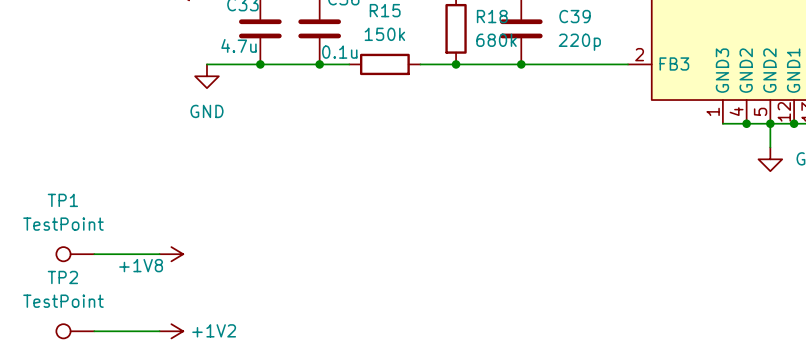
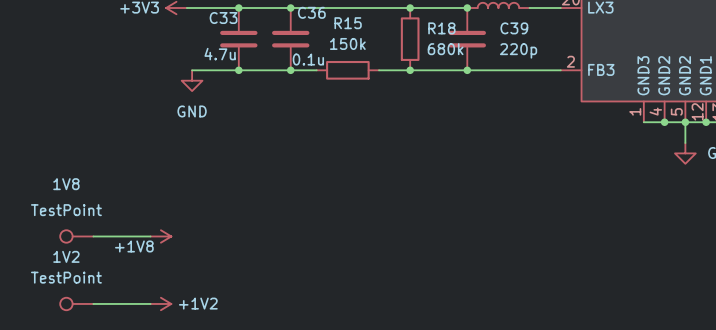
TP1 name: TP1 (62, 200) -> 1V8 (66, 184)
TP2 name: TP2 (62, 277) -> 1V2 (66, 256)

